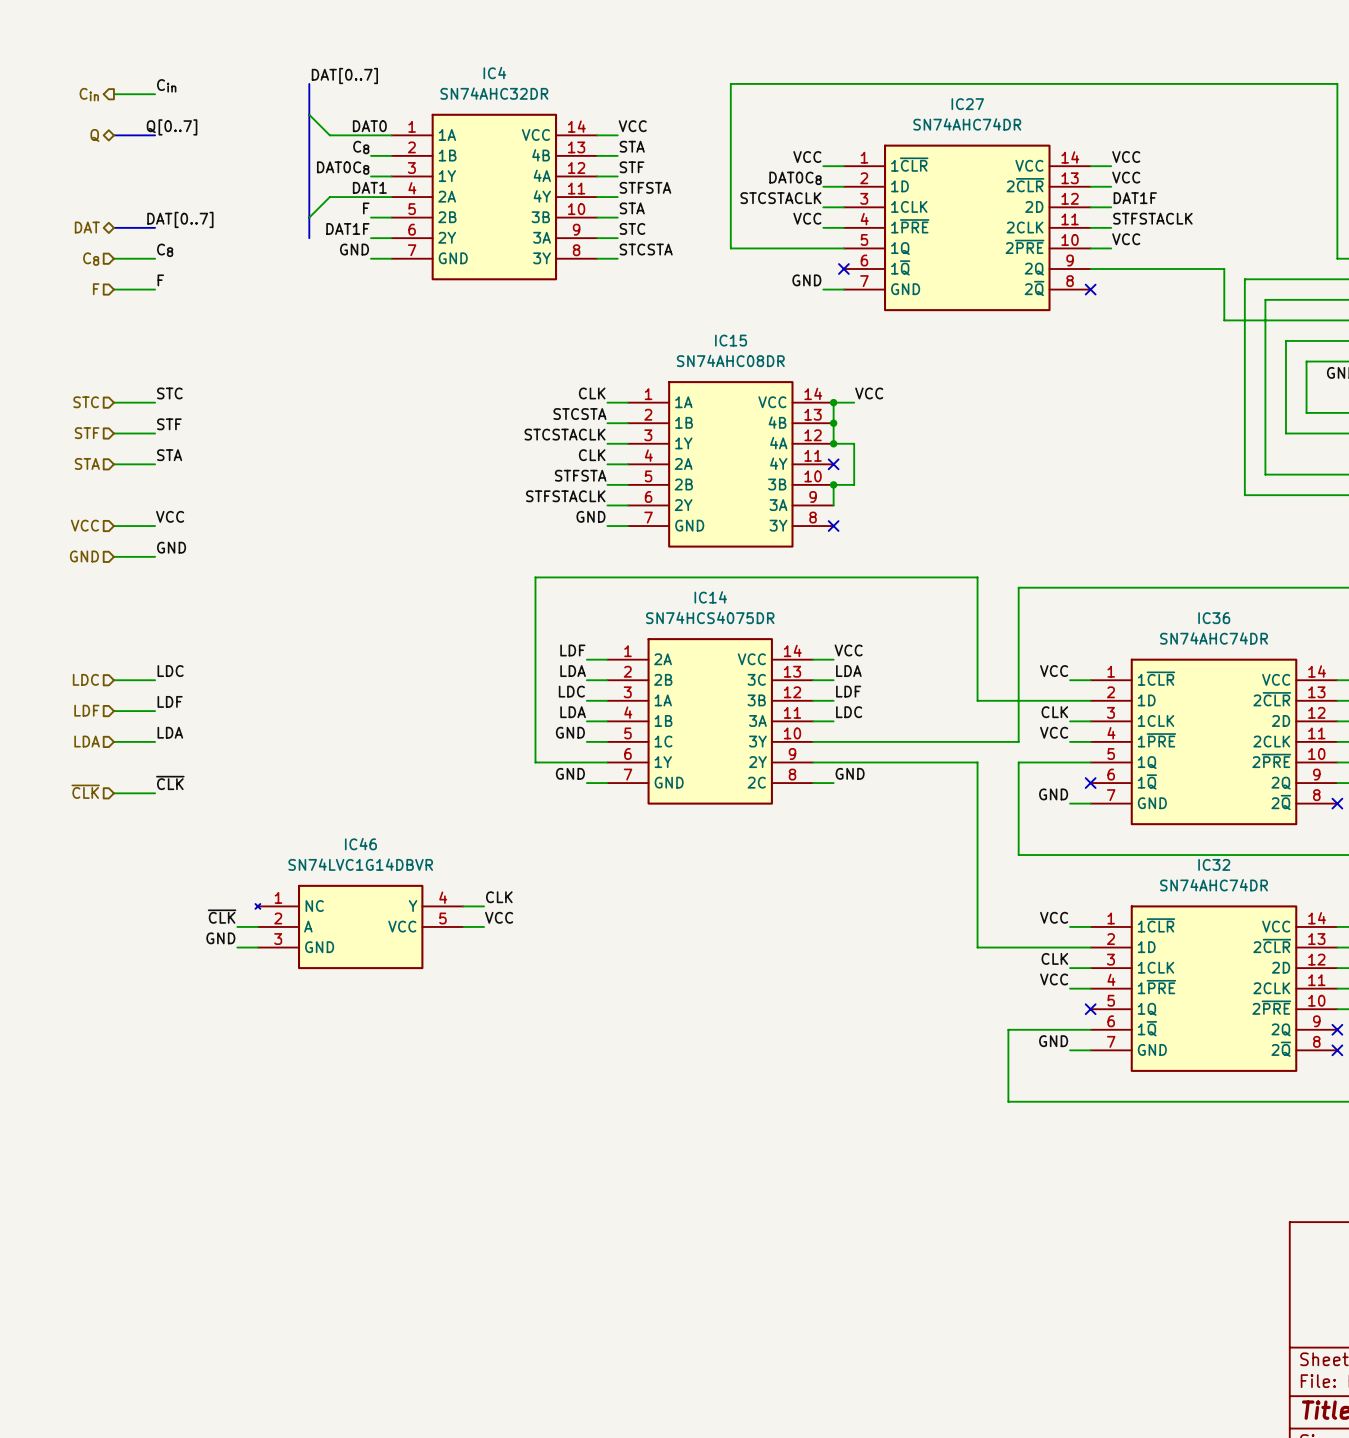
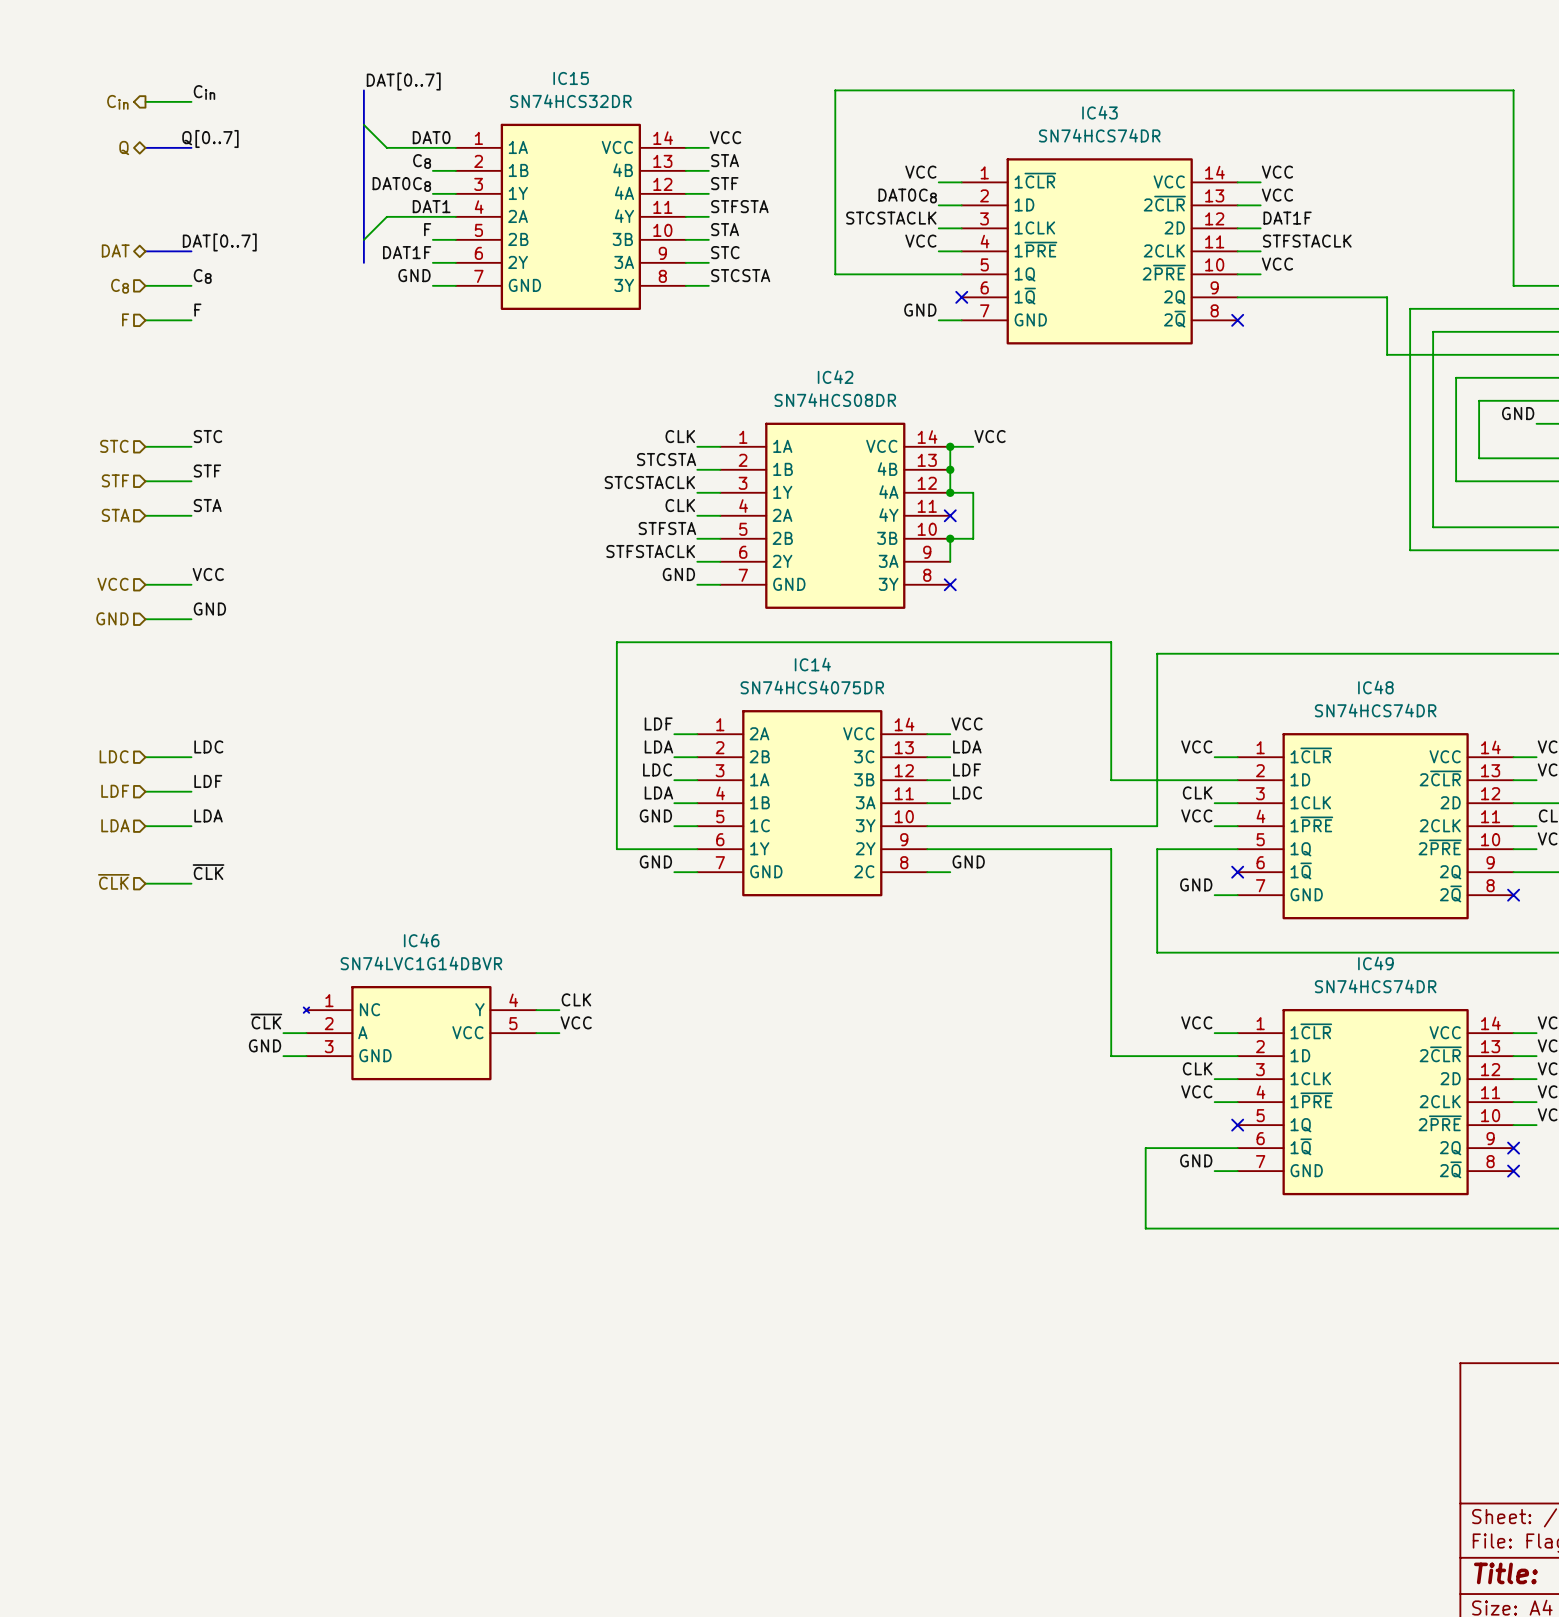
IC4 name: IC4 (494, 73) -> IC15 (571, 78)
IC4 value: SN74AHC32DR (494, 93) -> SN74HCS32DR (570, 101)
IC27 name: IC27 (967, 104) -> IC43 (1099, 112)
IC27 value: SN74AHC74DR (967, 124) -> SN74HCS74DR (1099, 135)
IC15 name: IC15 (731, 340) -> IC42 (835, 377)
IC15 value: SN74AHC08DR (730, 360) -> SN74HCS08DR (835, 400)
IC36 name: IC36 (1214, 618) -> IC48 (1375, 687)
IC36 value: SN74AHC74DR (1214, 638) -> SN74HCS74DR (1375, 710)
IC32 name: IC32 (1214, 864) -> IC49 (1375, 963)
IC32 value: SN74AHC74DR (1214, 885) -> SN74HCS74DR (1375, 986)

